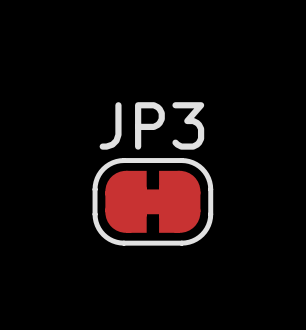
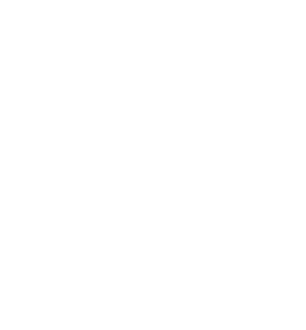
JP3: (152, 201) -> none

